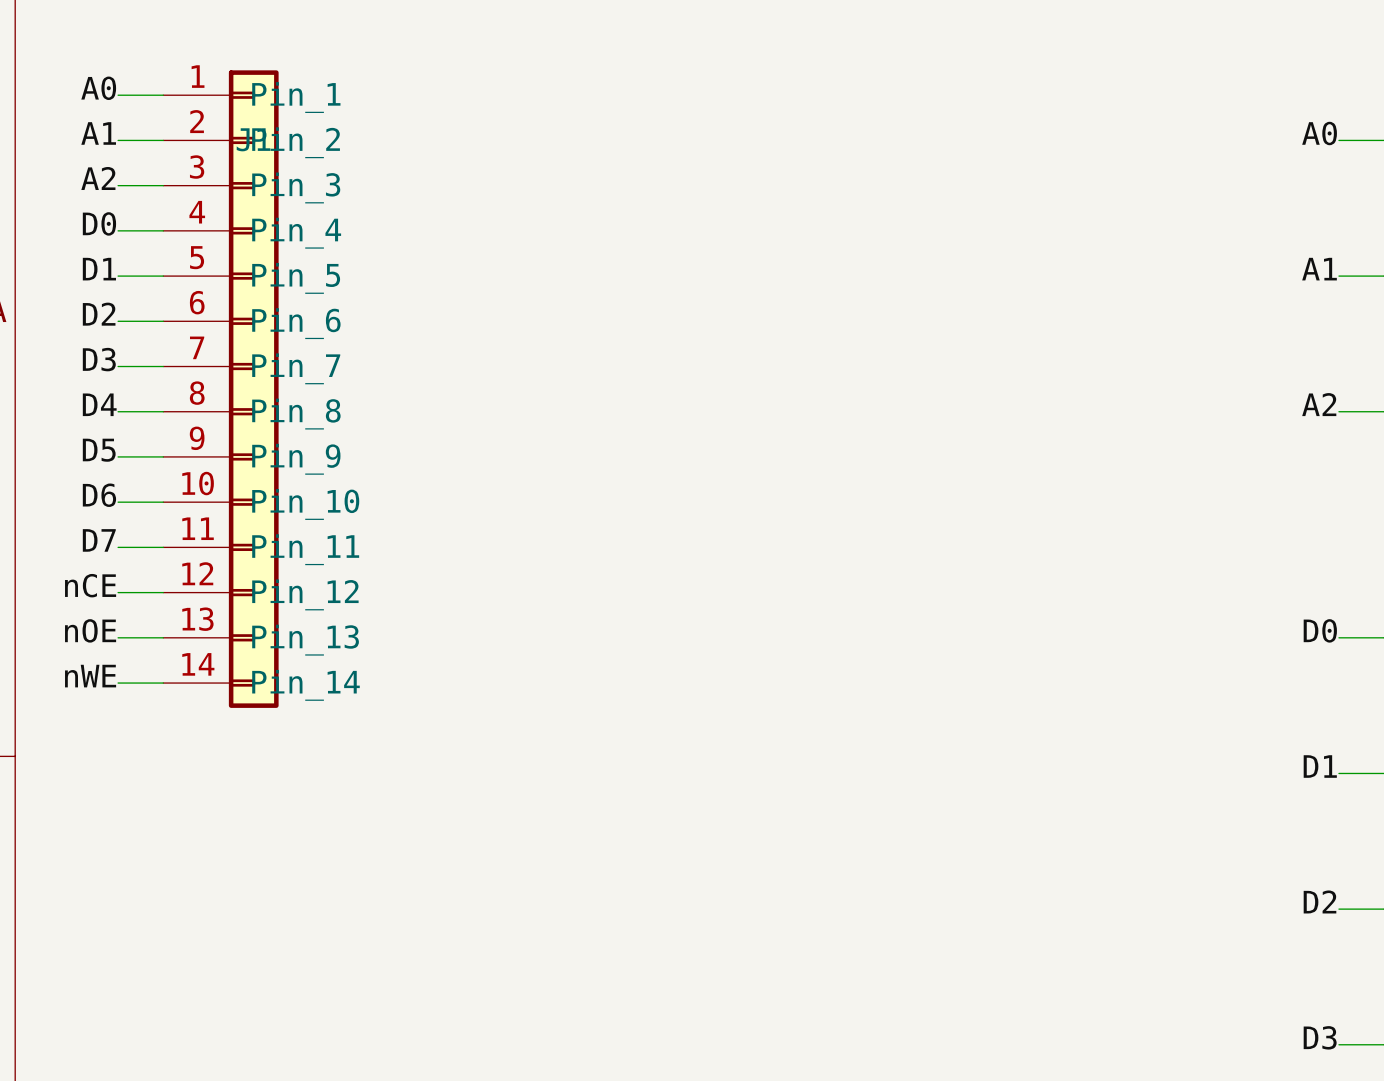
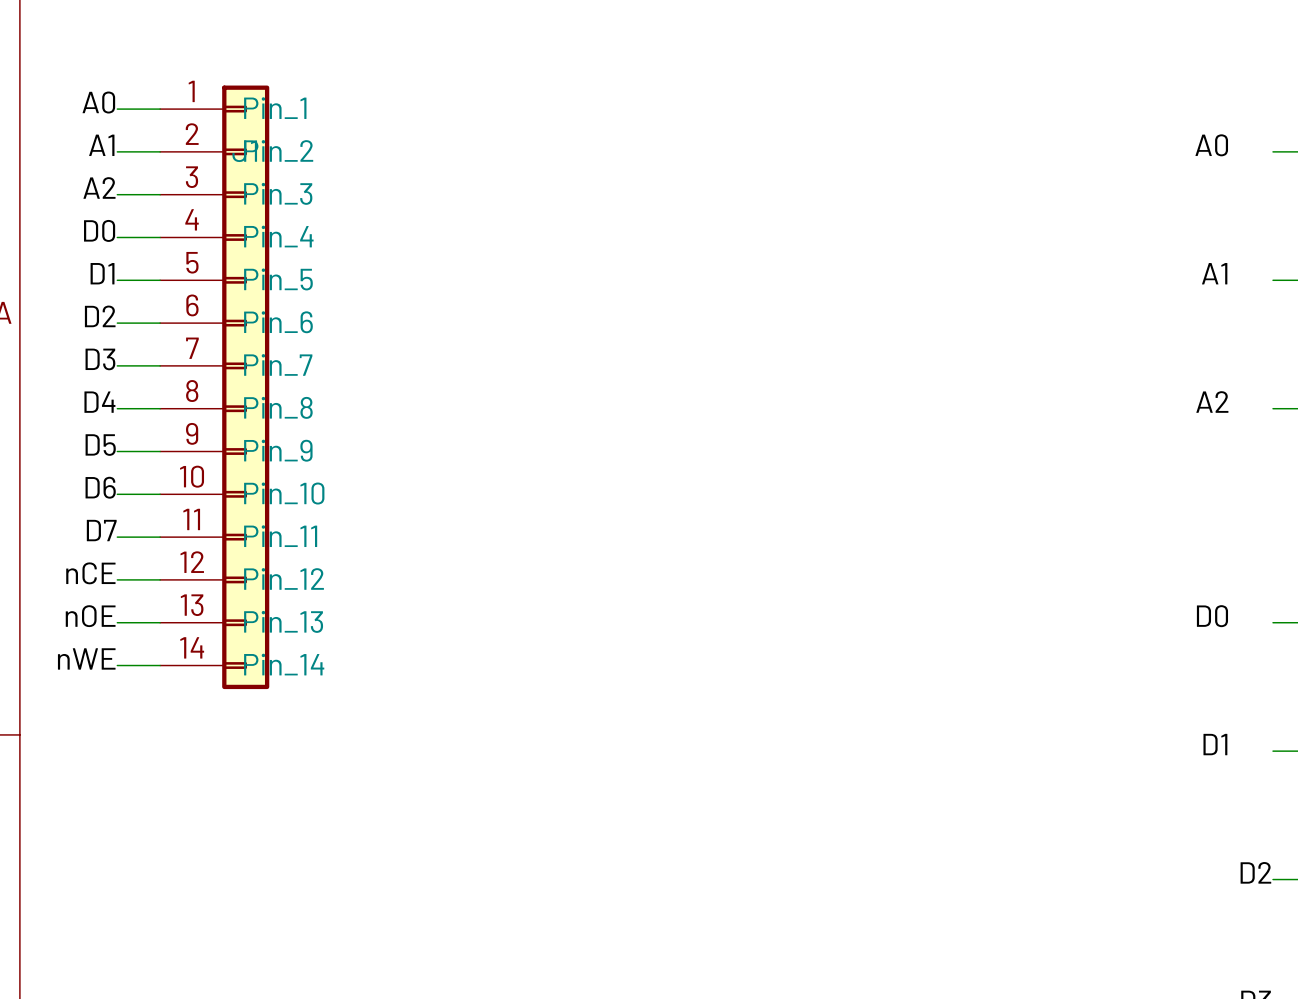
label position: A0 (1319, 133) -> A0 (1211, 145)
label position: A1 (1319, 269) -> A1 (1214, 273)
label position: A2 (1319, 404) -> A2 (1212, 402)
label position: D0 (1320, 630) -> D0 (1212, 616)
label position: D1 (1320, 766) -> D1 (1215, 744)

